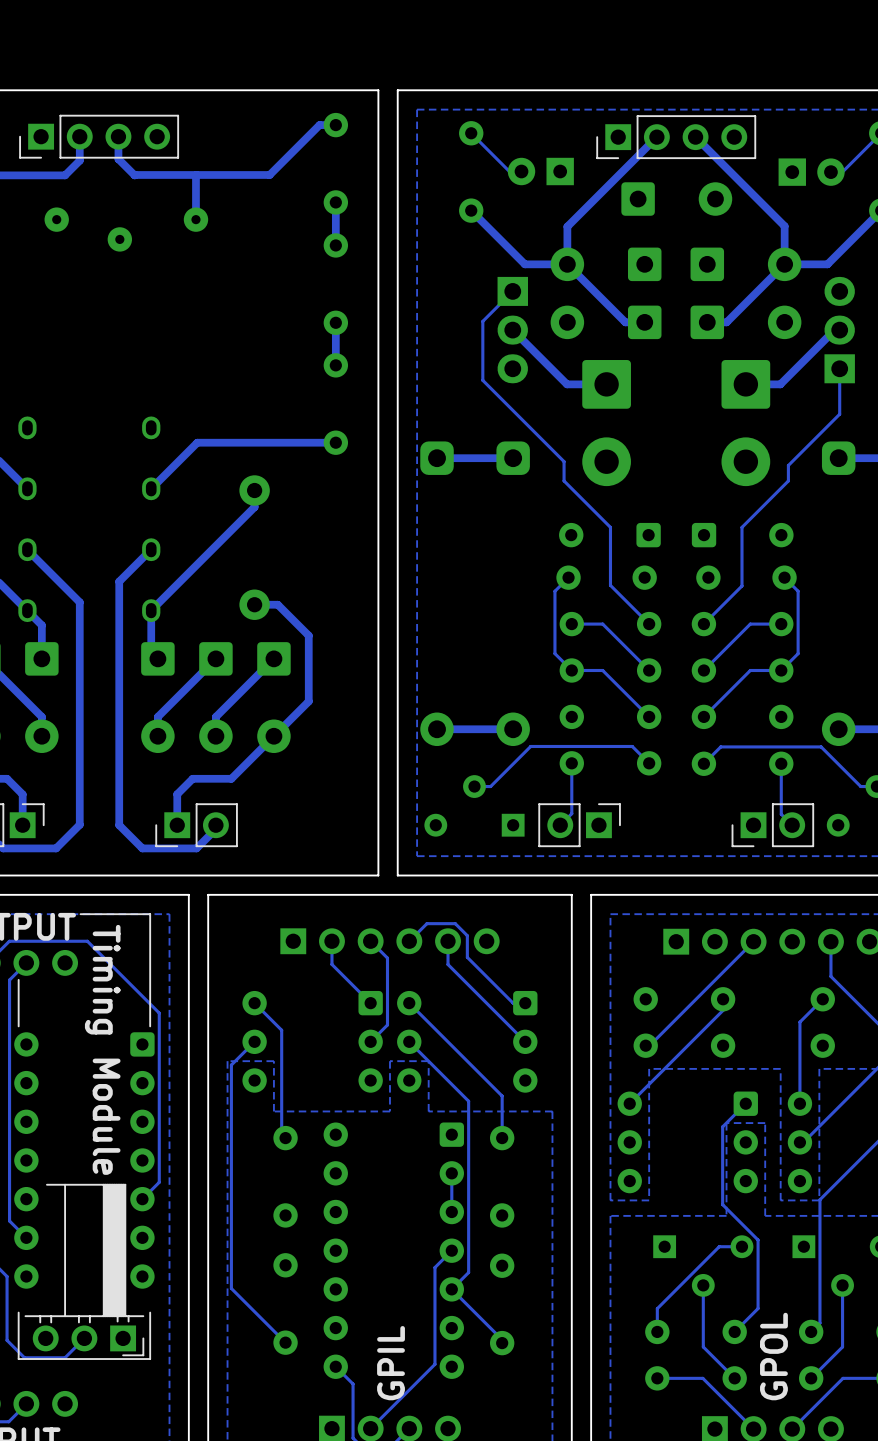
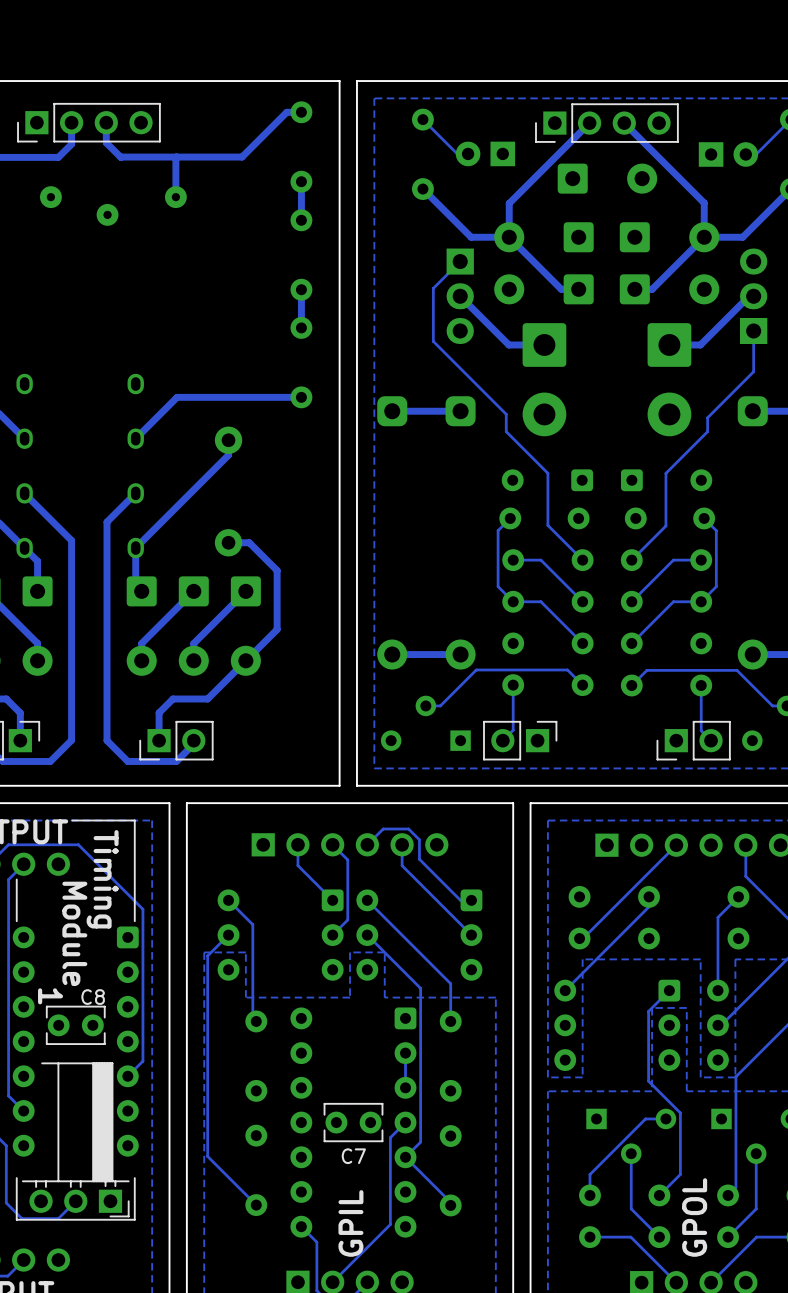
text: none -> Module (74, 933)
text: Timing Module (102, 1049) -> Timing (102, 879)
text: none -> 1 (50, 996)
C8: none -> (75, 1025)
C7: none -> (353, 1122)

